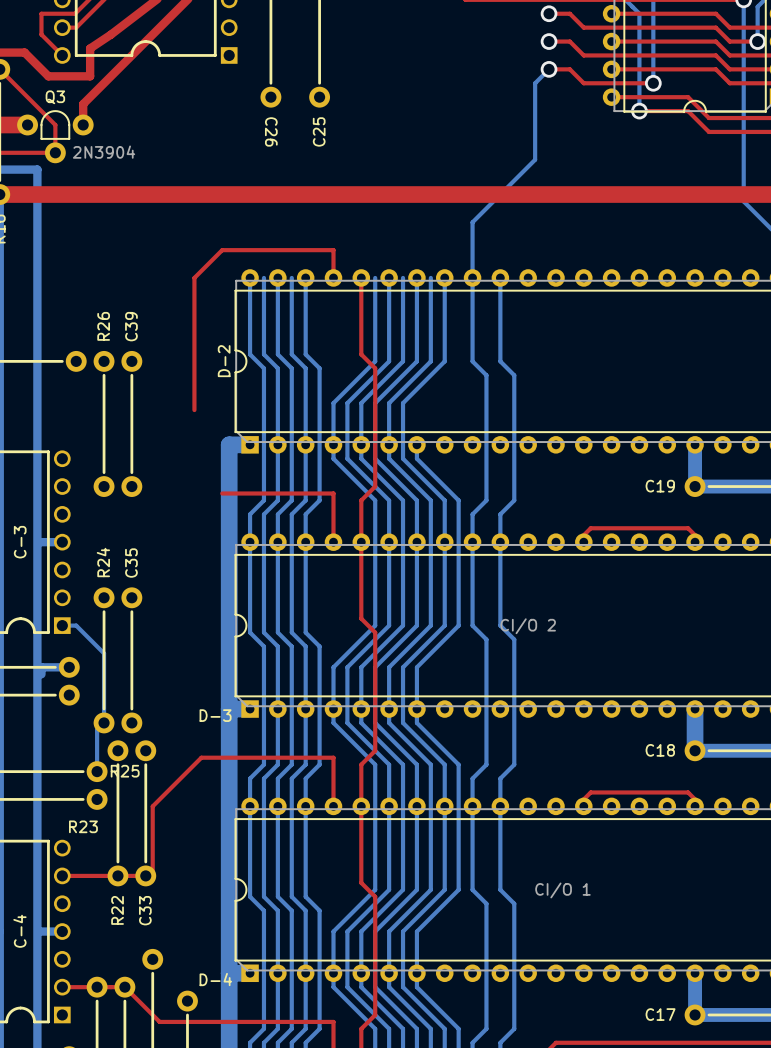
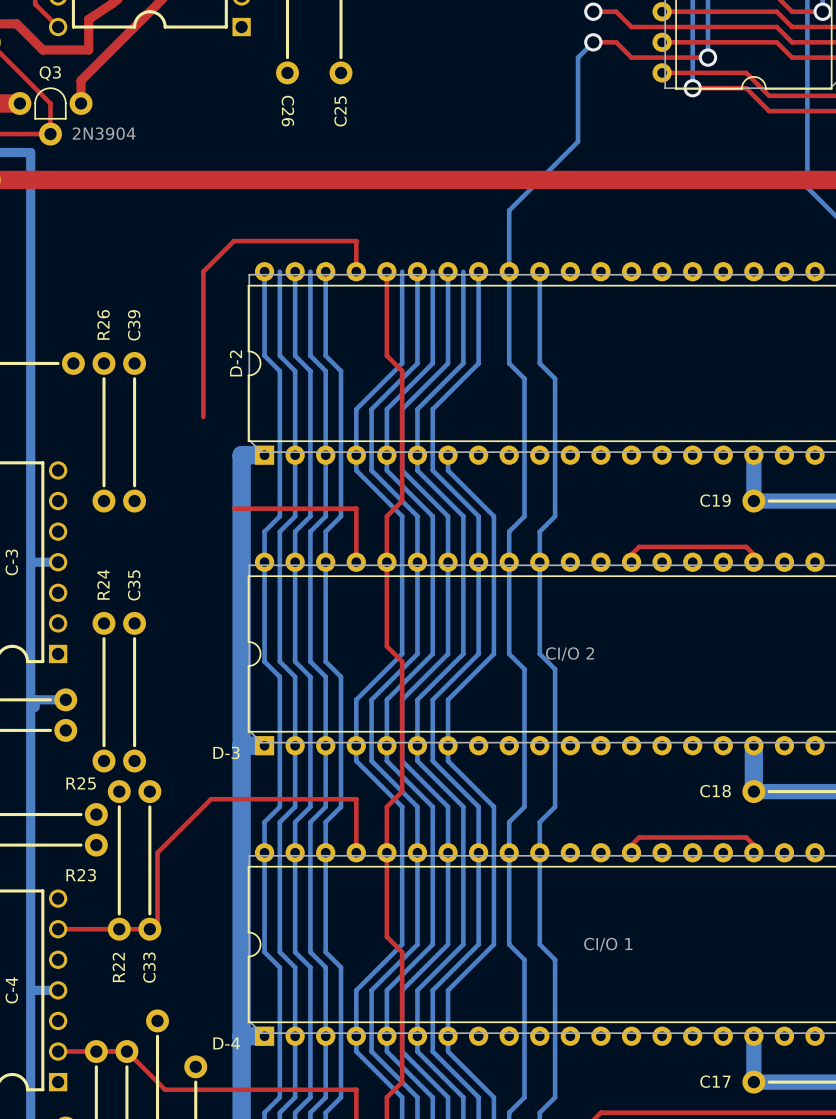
bottom track: (62, 625) (76, 625) (104, 653) (104, 722) (97, 729) (97, 771) -> none
R25 name position: R25 (125, 771) -> R25 (81, 783)

